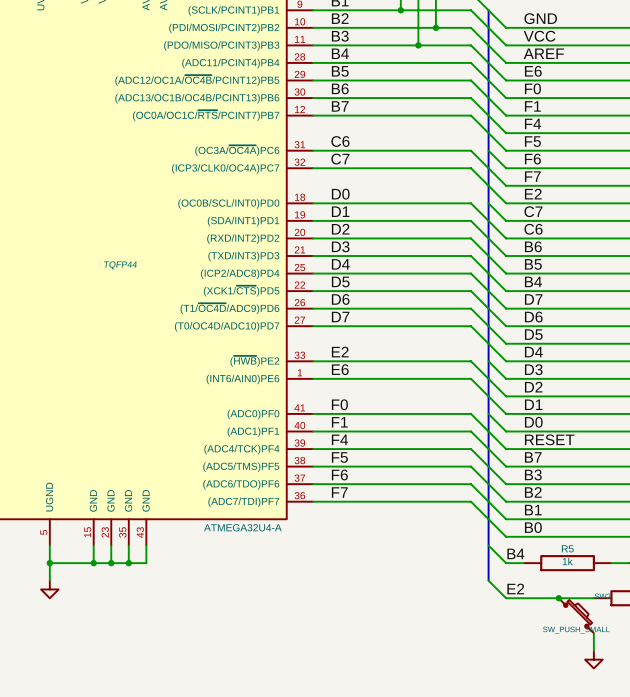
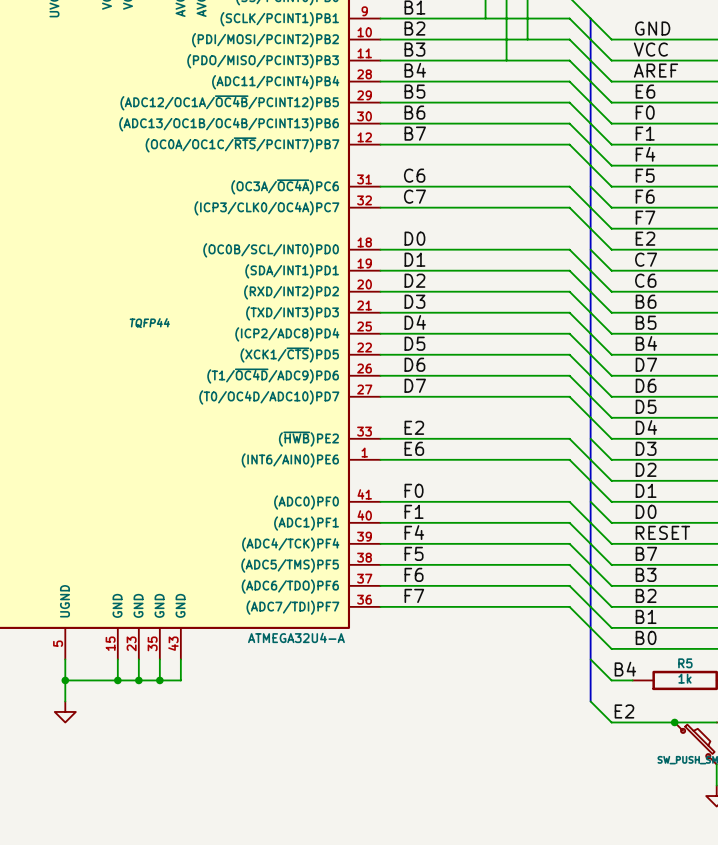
junction: (400, 10) -> none
junction: (435, 27) -> none
junction: (418, 45) -> none

